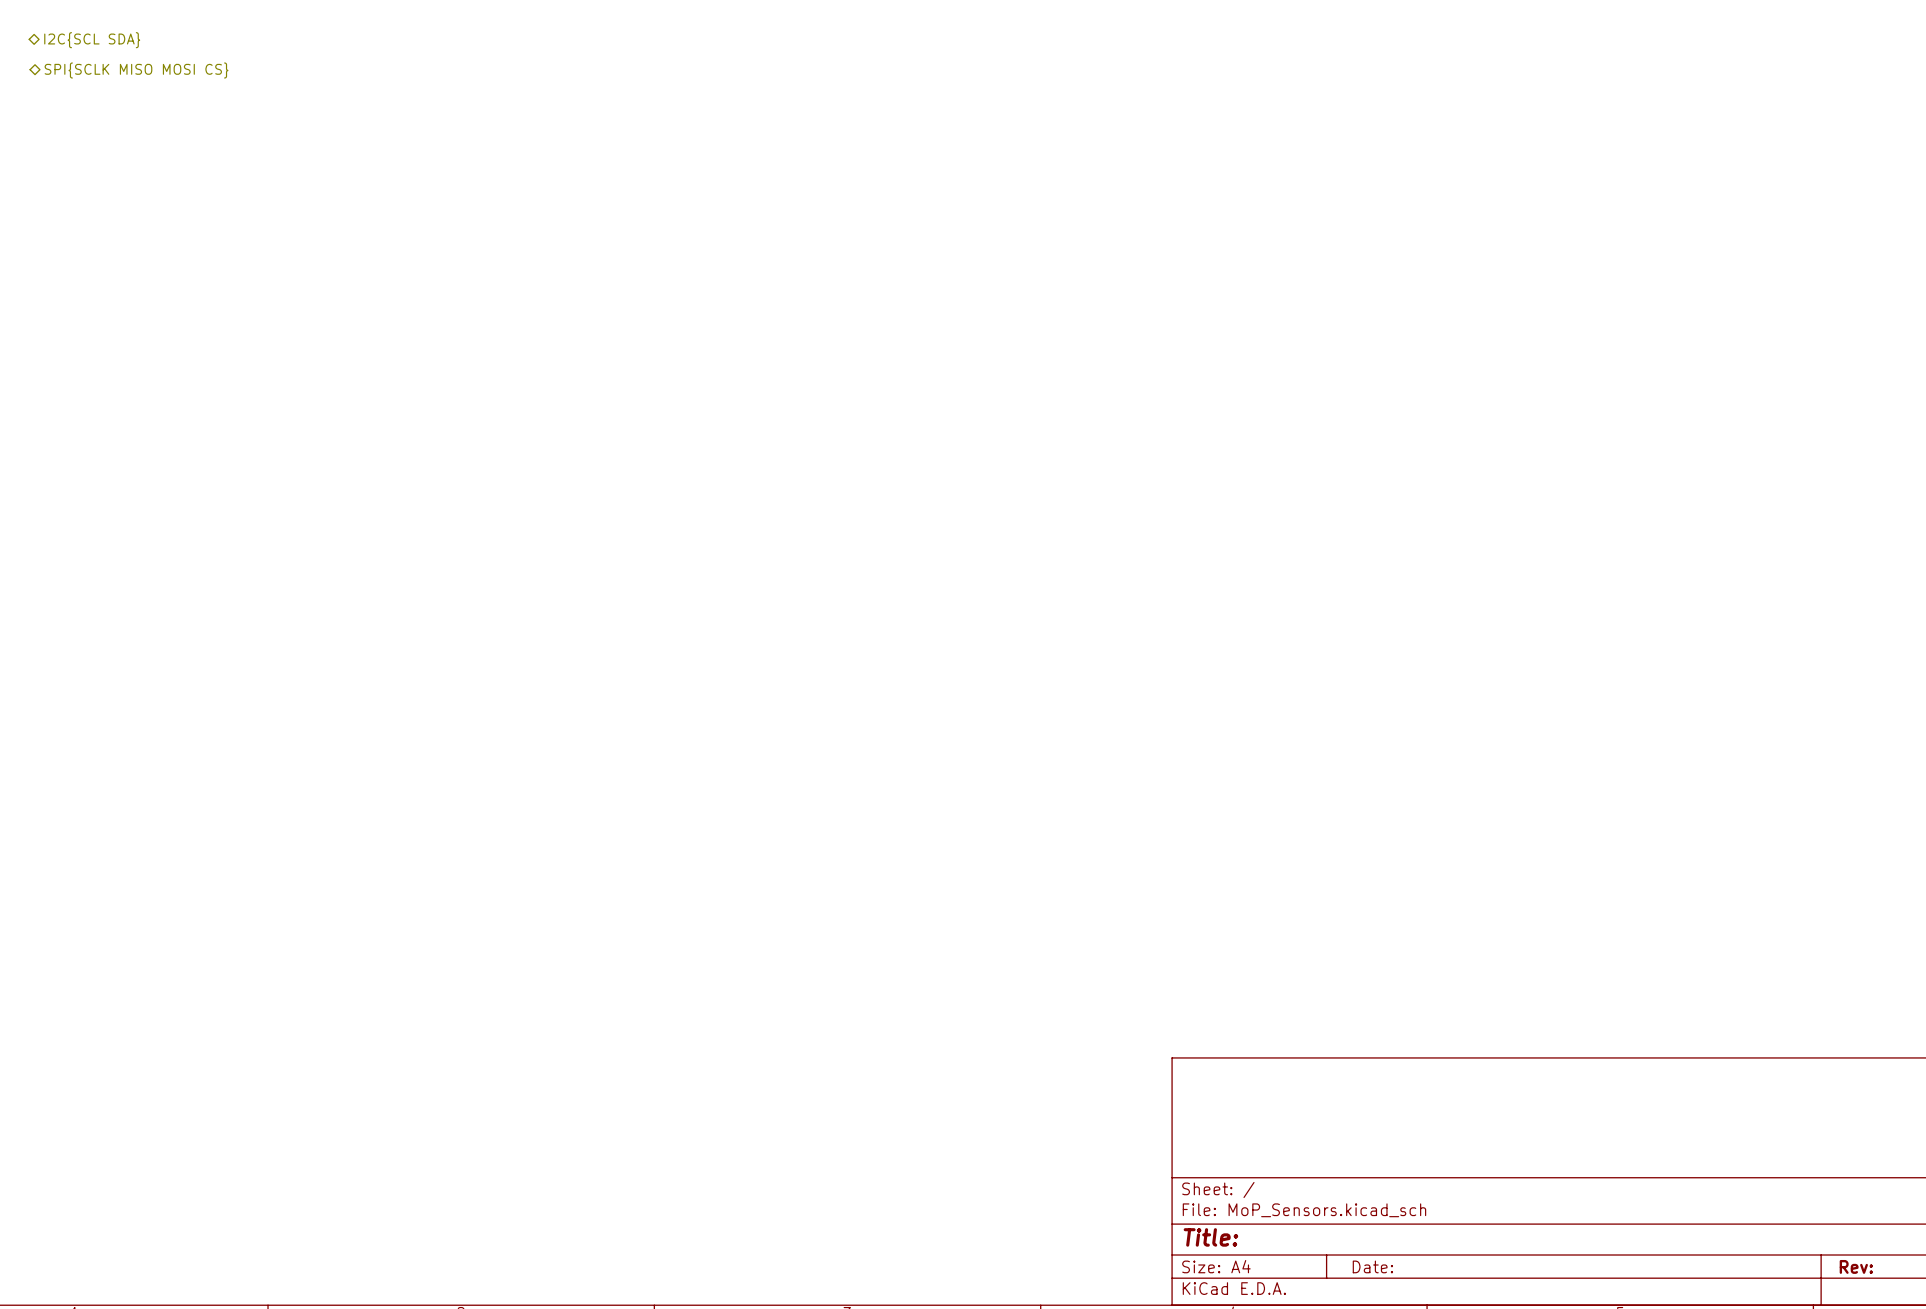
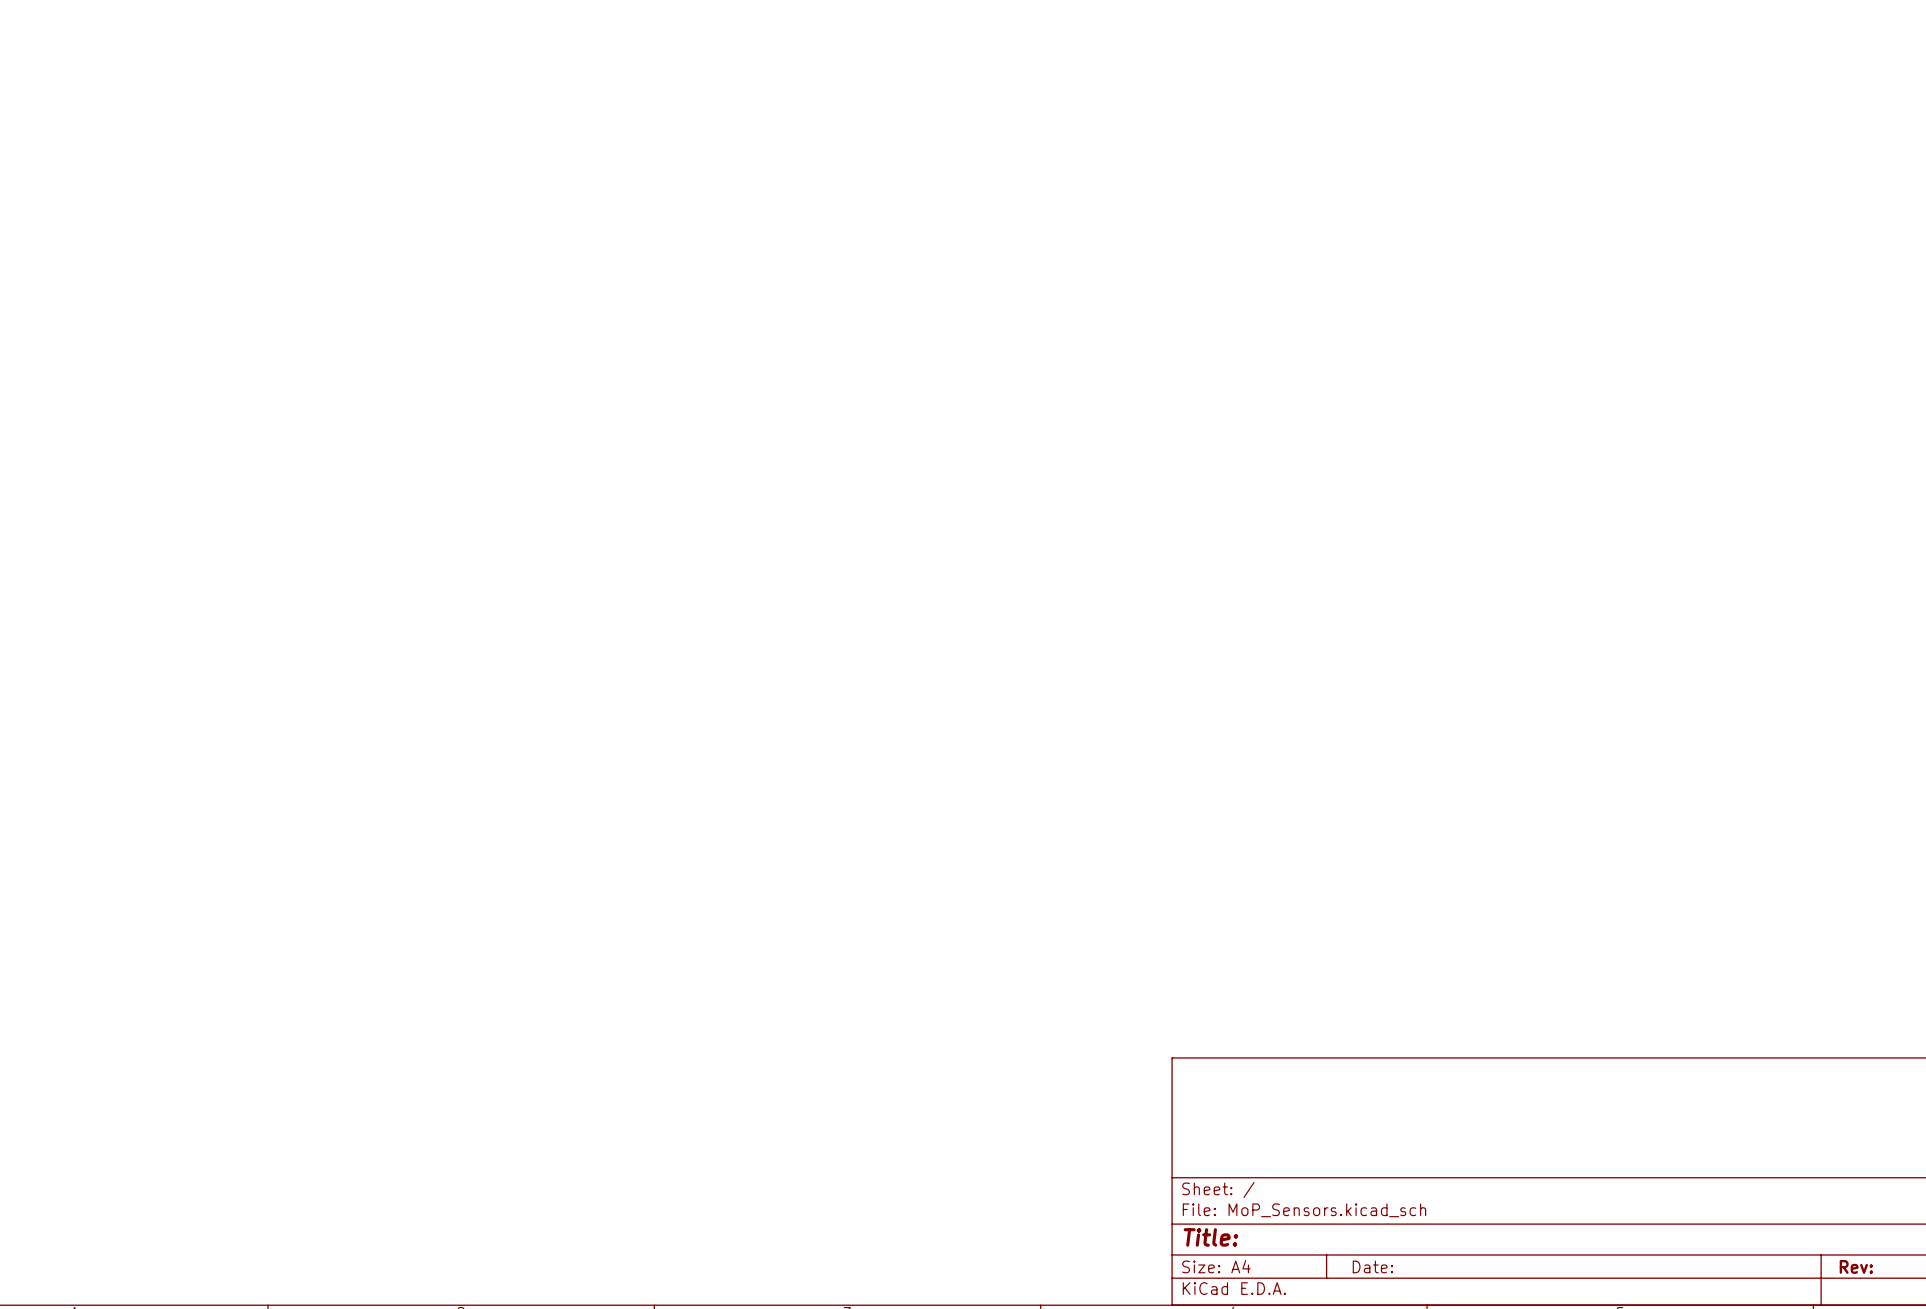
hierarchical label: I2C{SCL SDA} (92, 40) -> none
hierarchical label: SPI{SCLK MISO MOSI CS} (136, 70) -> none

